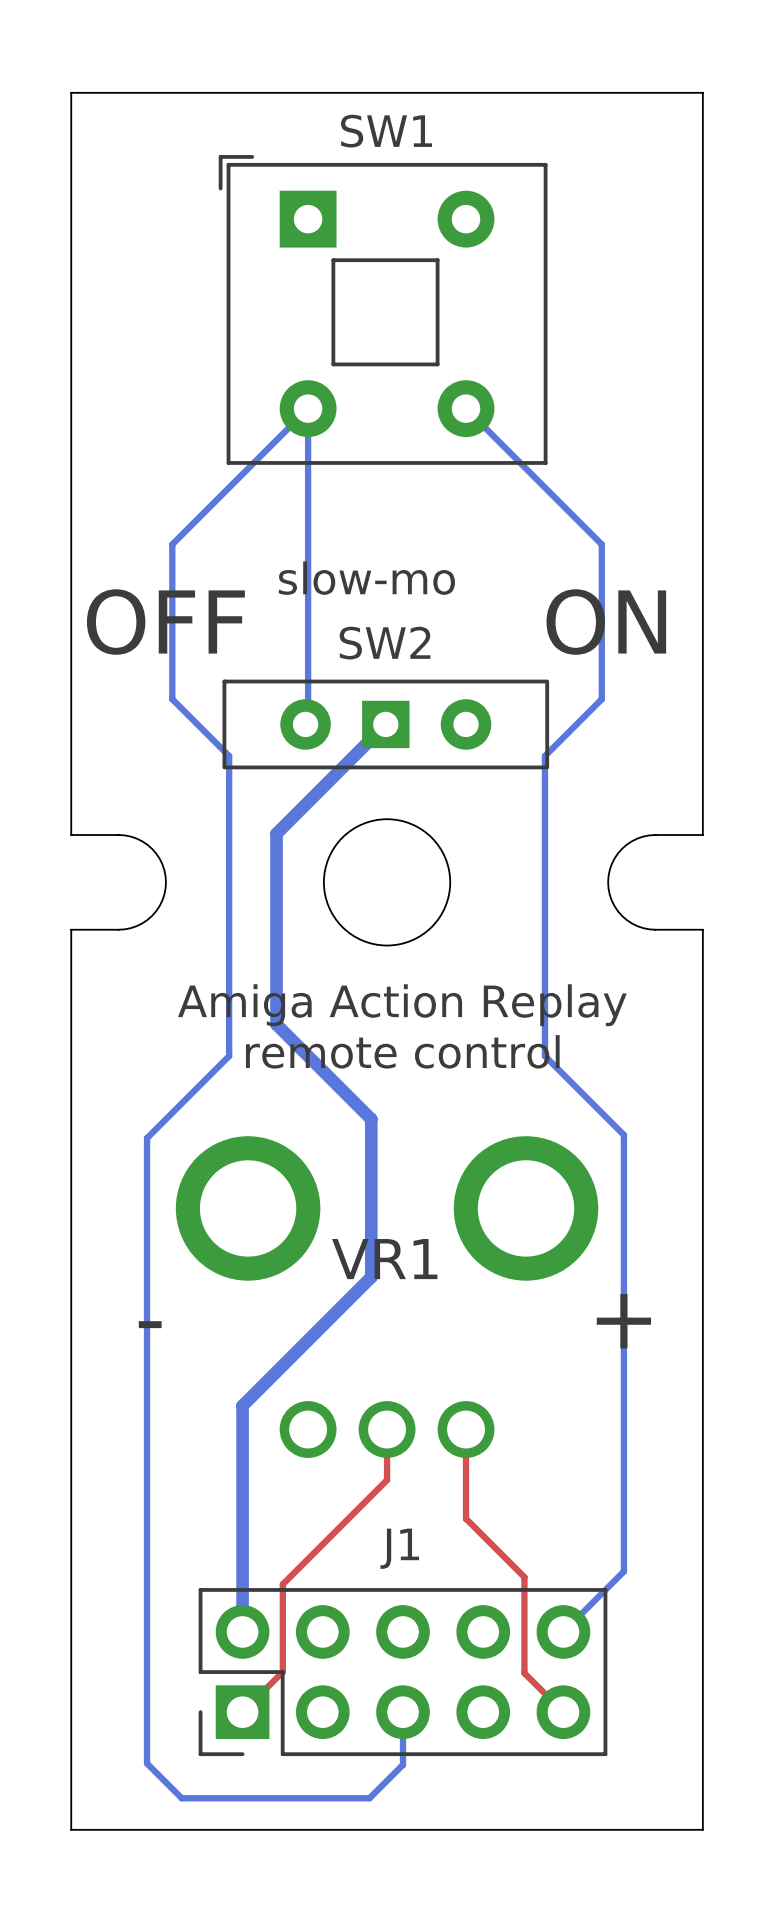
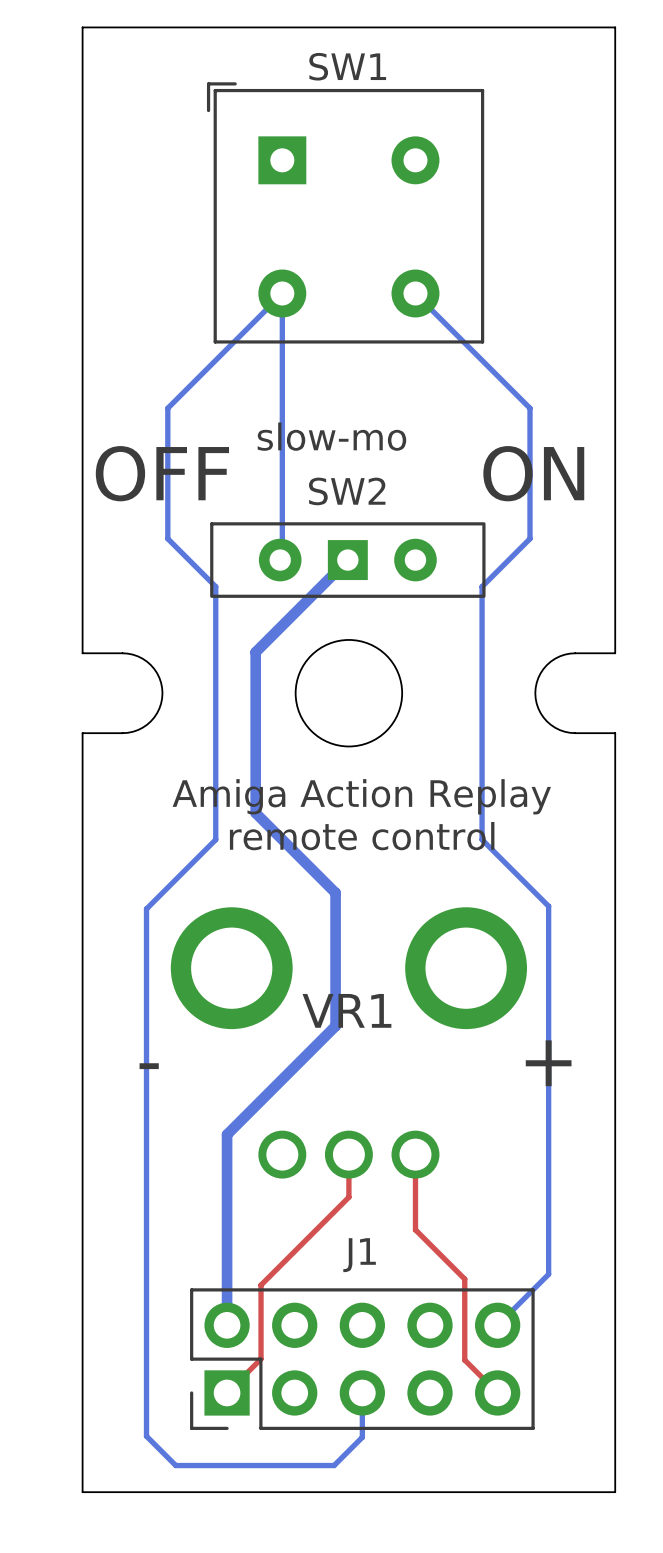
SW1 footprint: [218, 155, 548, 465] -> [206, 82, 485, 344]

